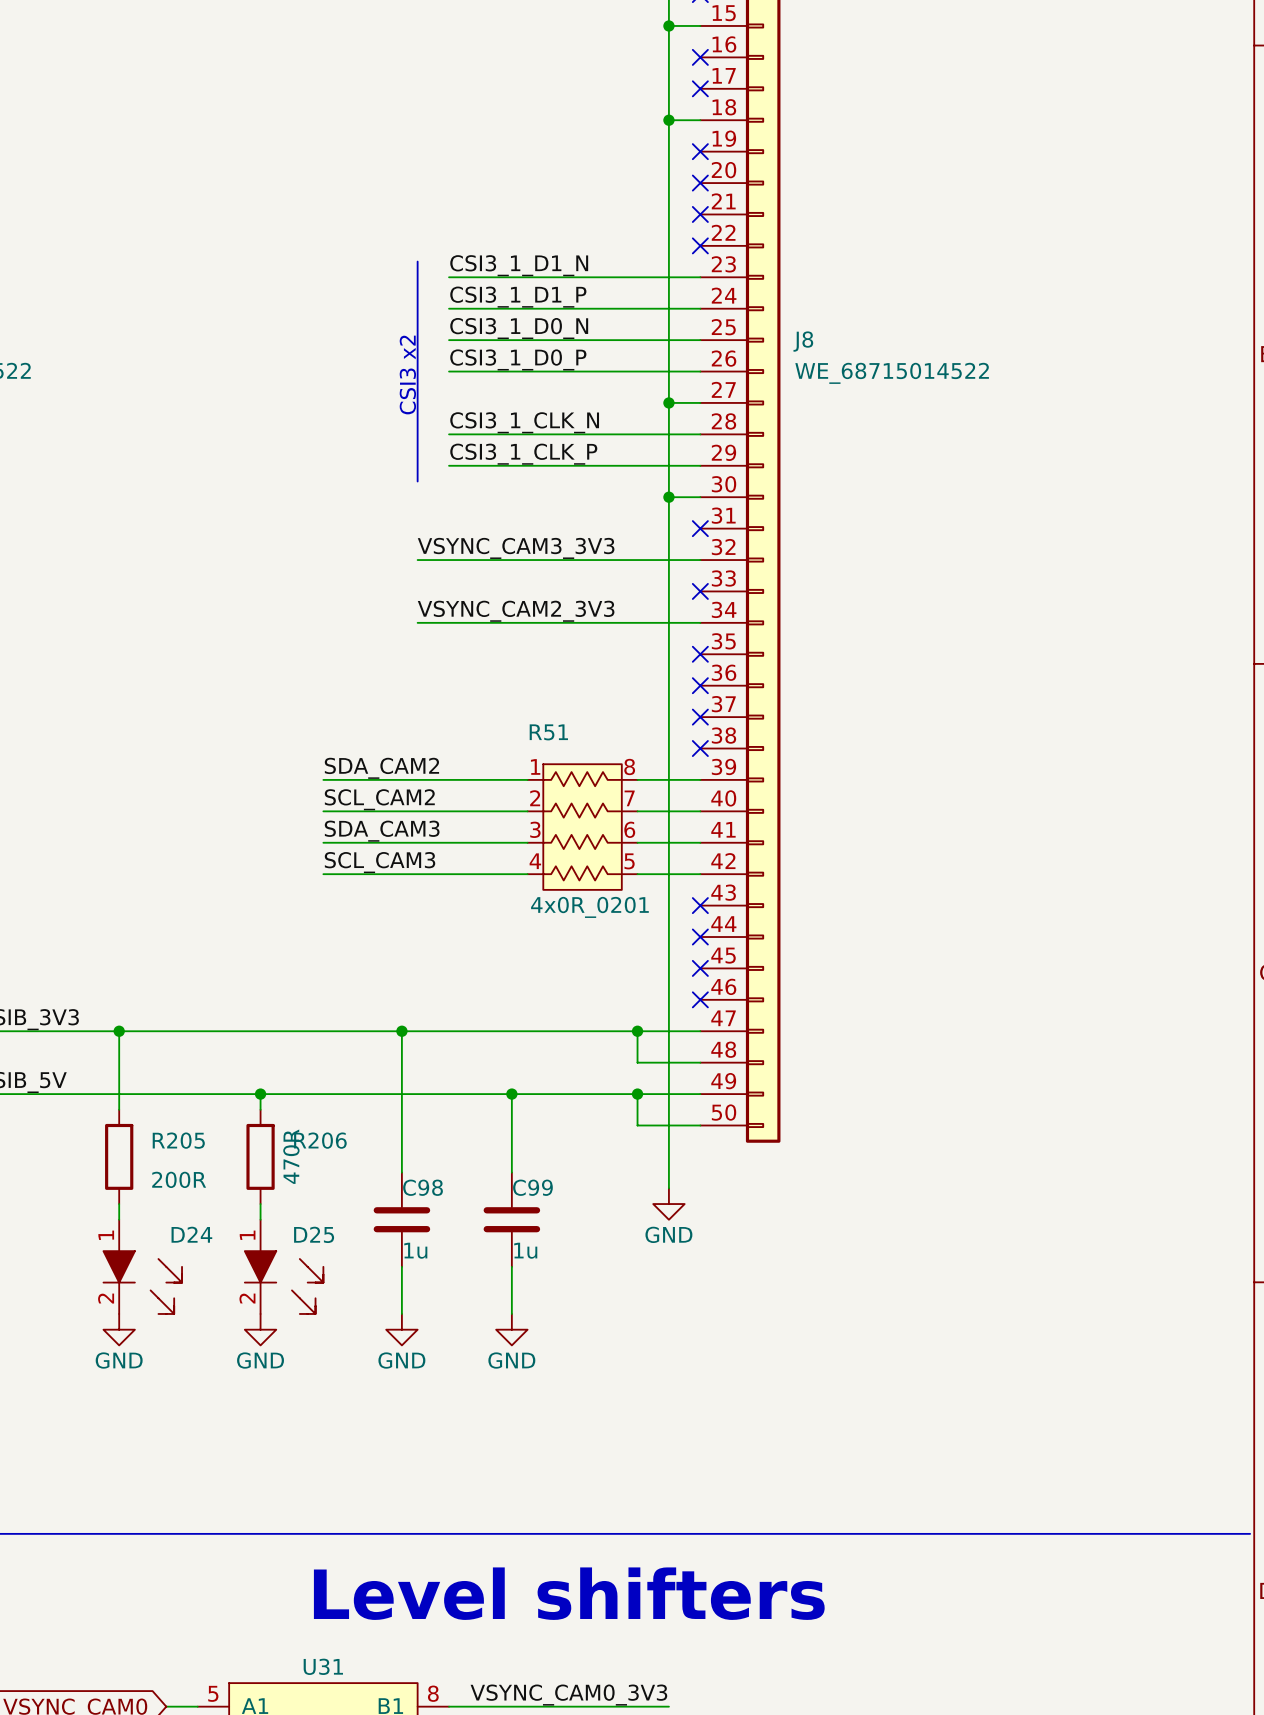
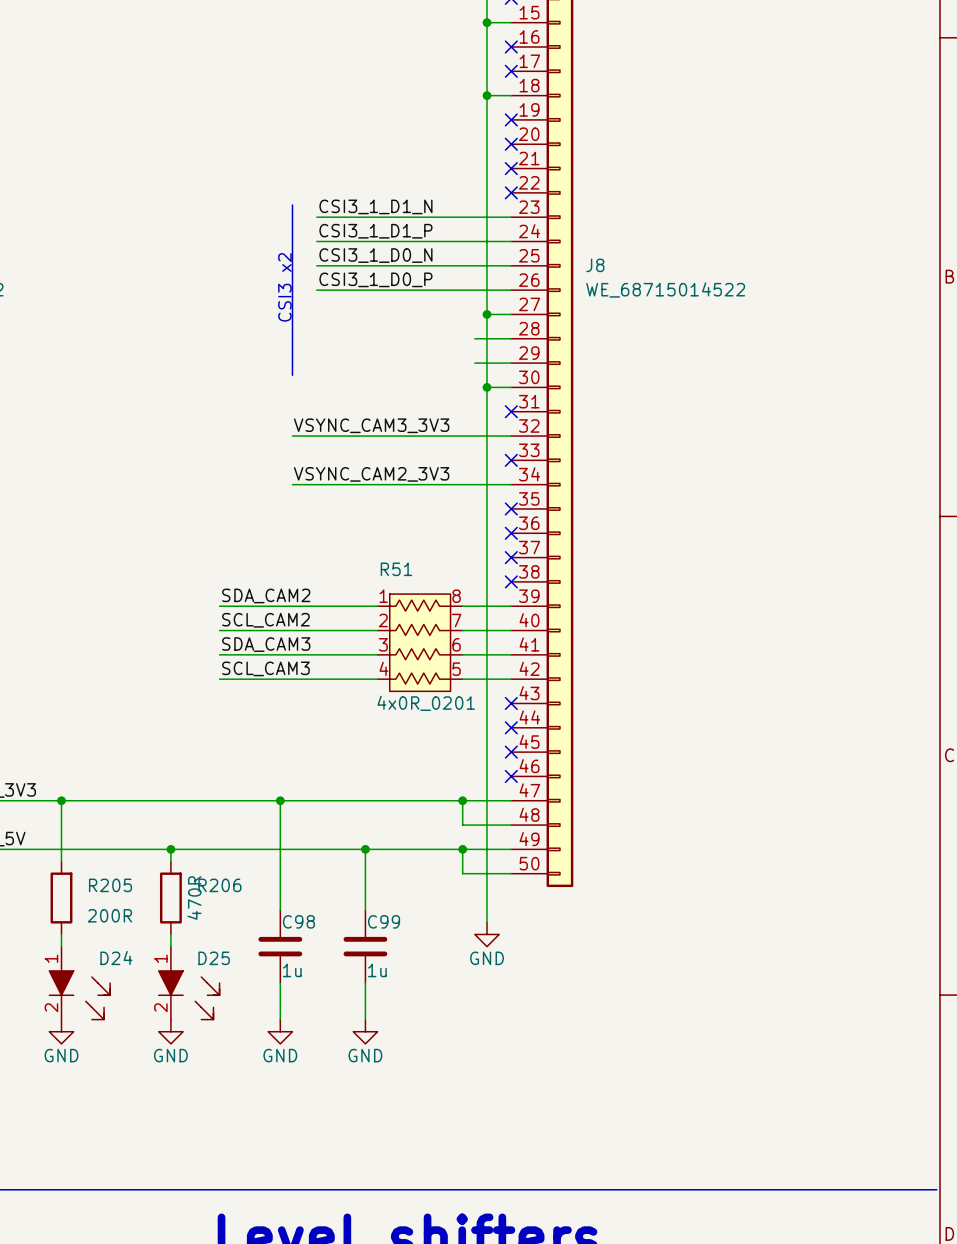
label: CSI3_1_CLK_N (524, 422) -> none
wire: (449, 434) (653, 434) -> none
label: CSI3_1_CLK_P (523, 454) -> none
wire: (449, 465) (653, 465) -> none

